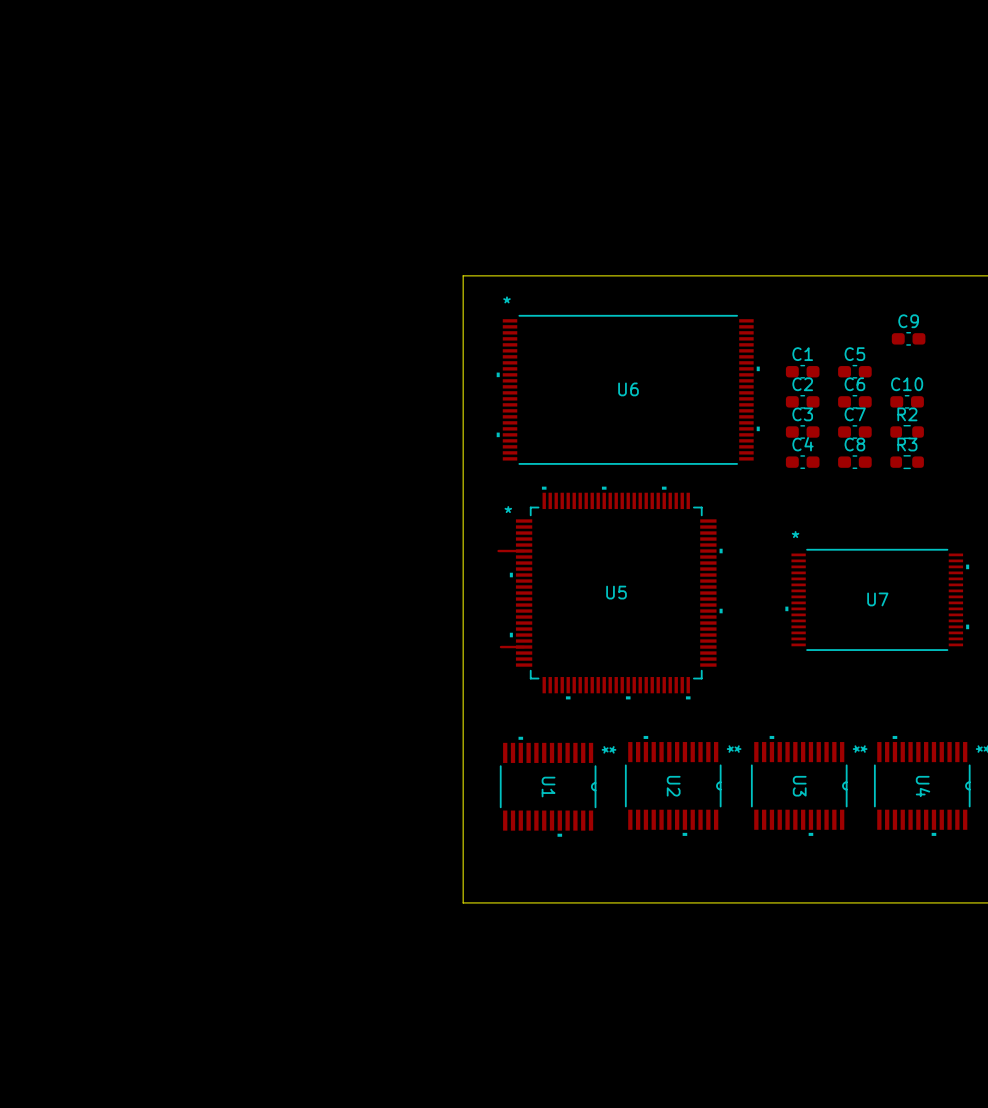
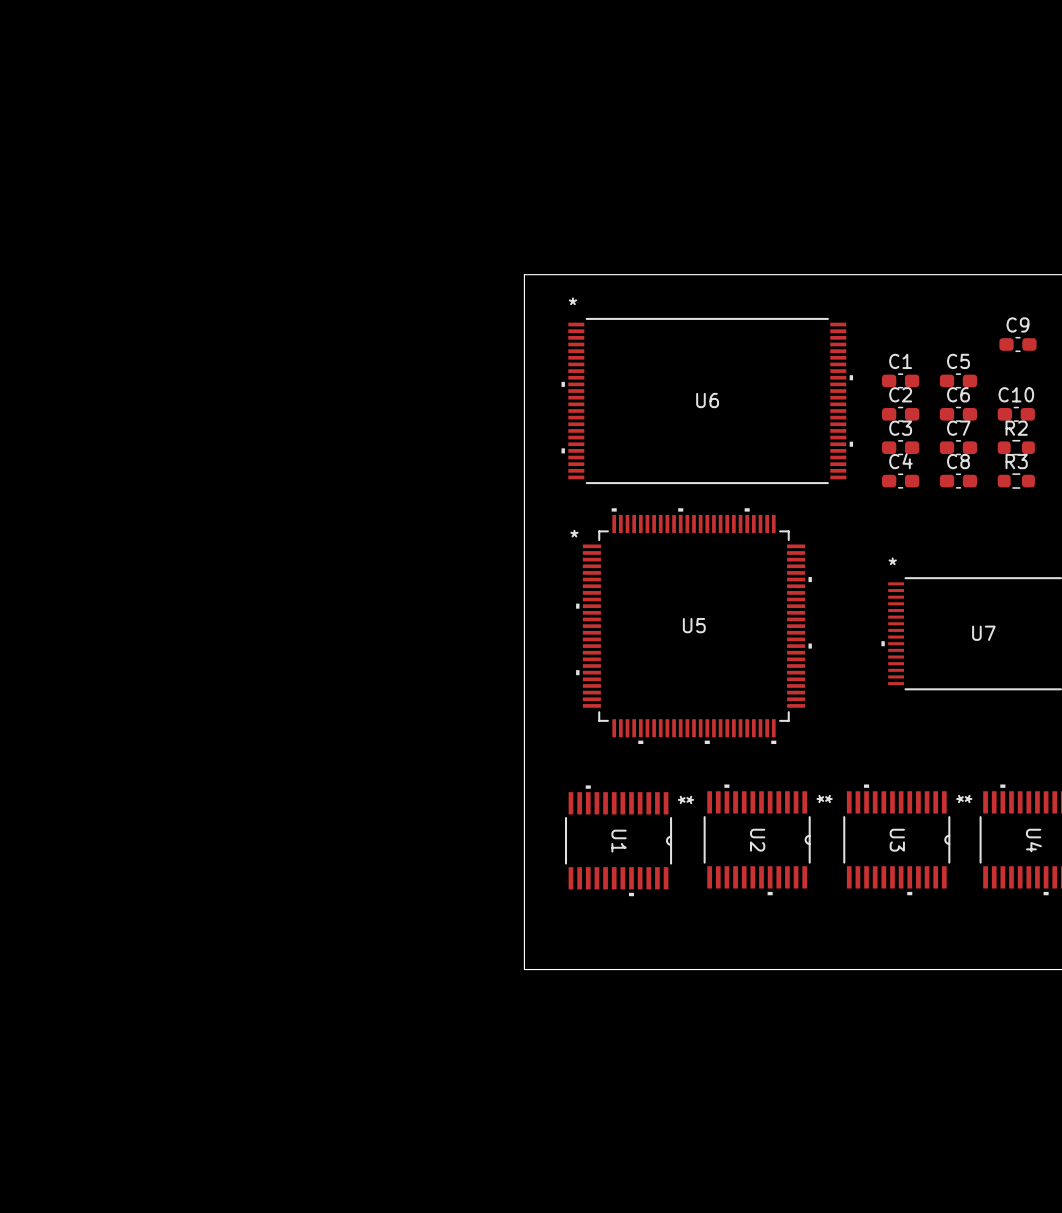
top track: (498, 551) (524, 551) -> none
top track: (500, 647) (524, 647) -> none

